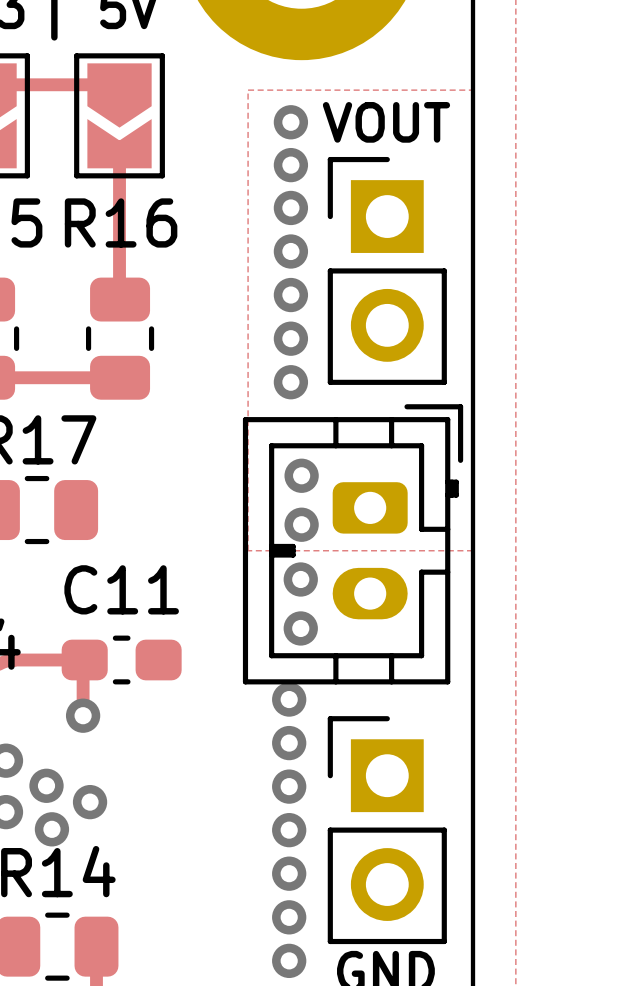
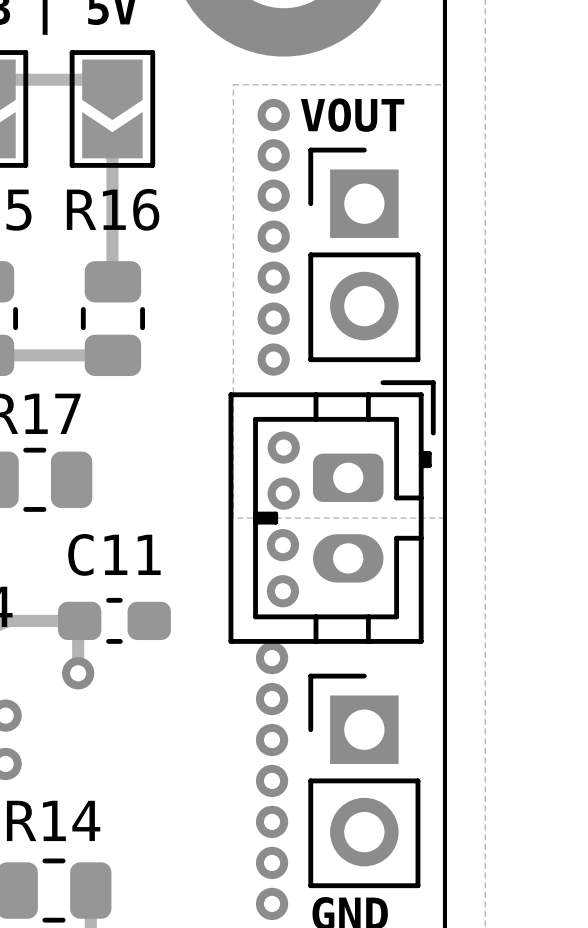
via: (46, 785) -> none
via: (90, 802) -> none
via: (51, 829) -> none

